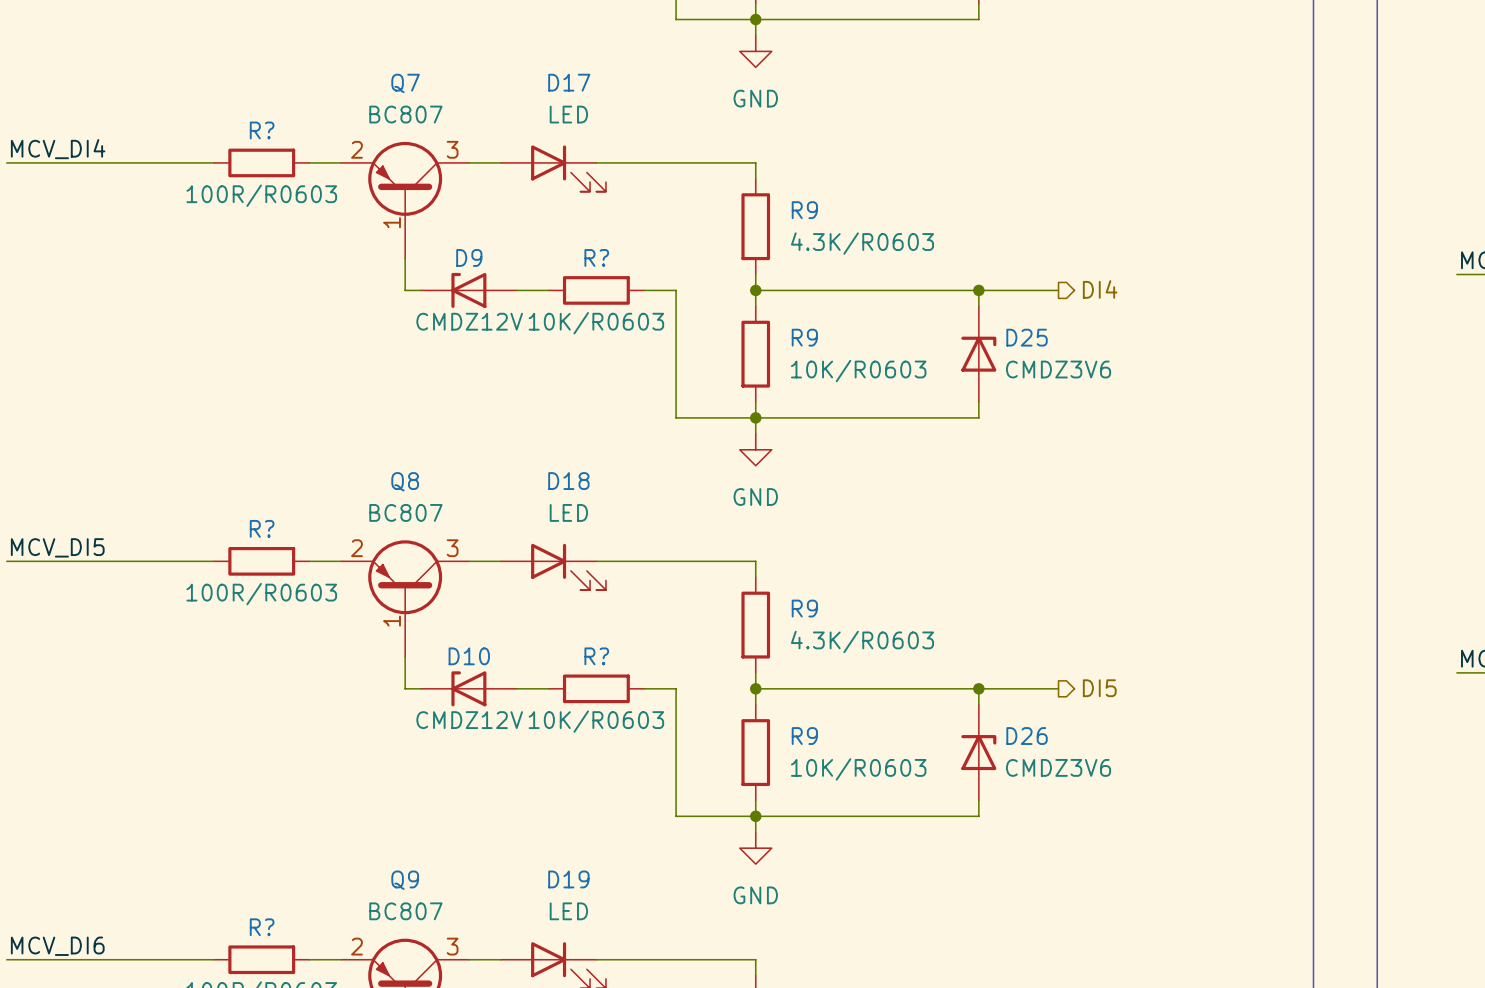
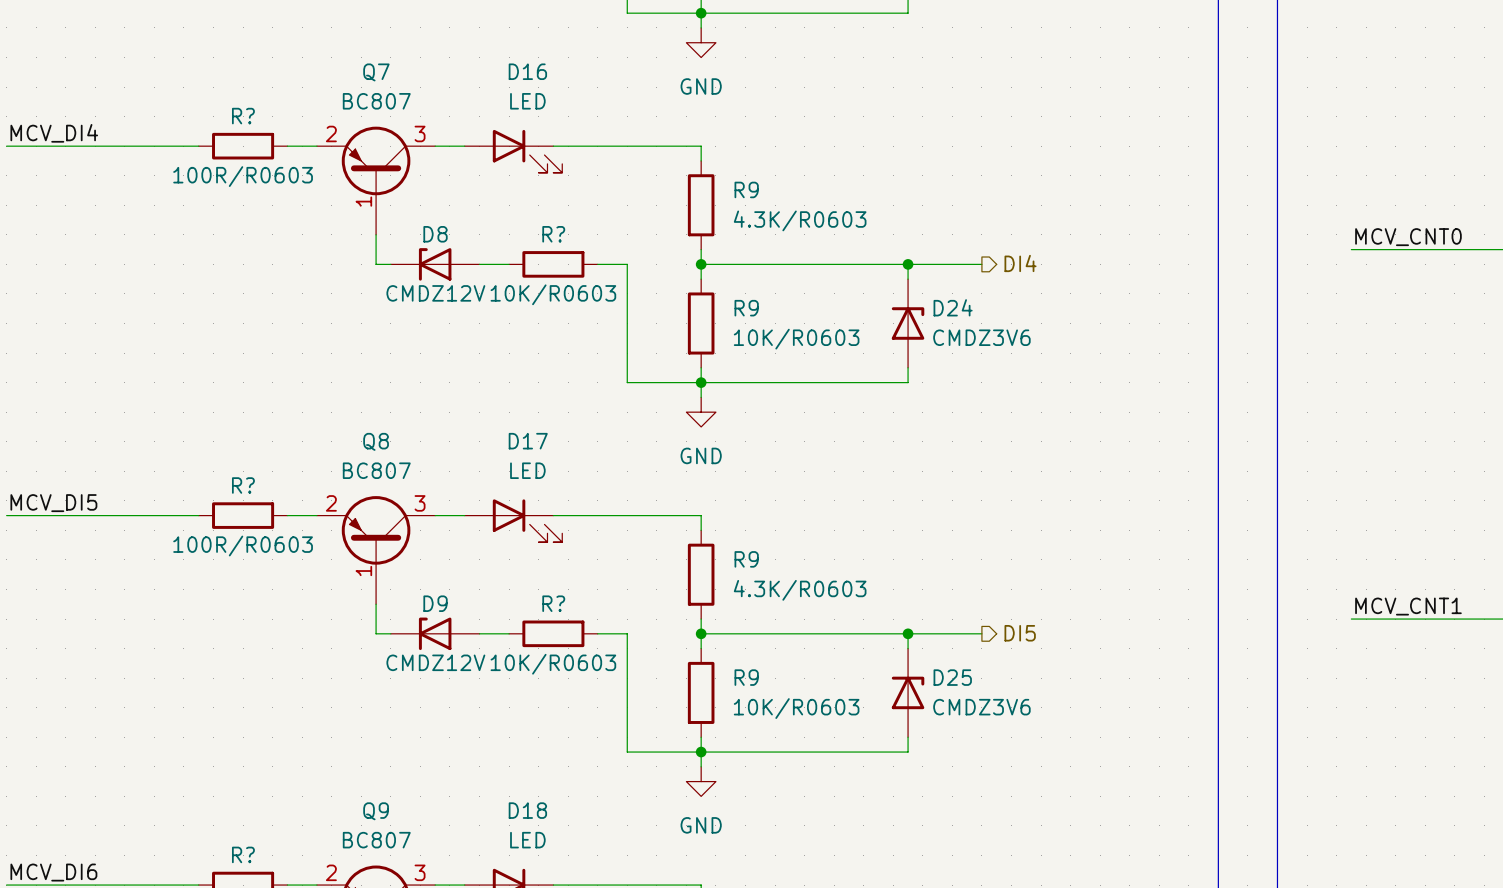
D17 name: D17 (569, 82) -> D16 (527, 71)
D9 name: D9 (469, 257) -> D8 (435, 234)
D25 name: D25 (1027, 337) -> D24 (953, 307)
D18 name: D18 (568, 481) -> D17 (528, 441)
D10 name: D10 (469, 656) -> D9 (435, 603)
D26 name: D26 (1027, 736) -> D25 (952, 677)
D19 name: D19 (568, 879) -> D18 (527, 810)

